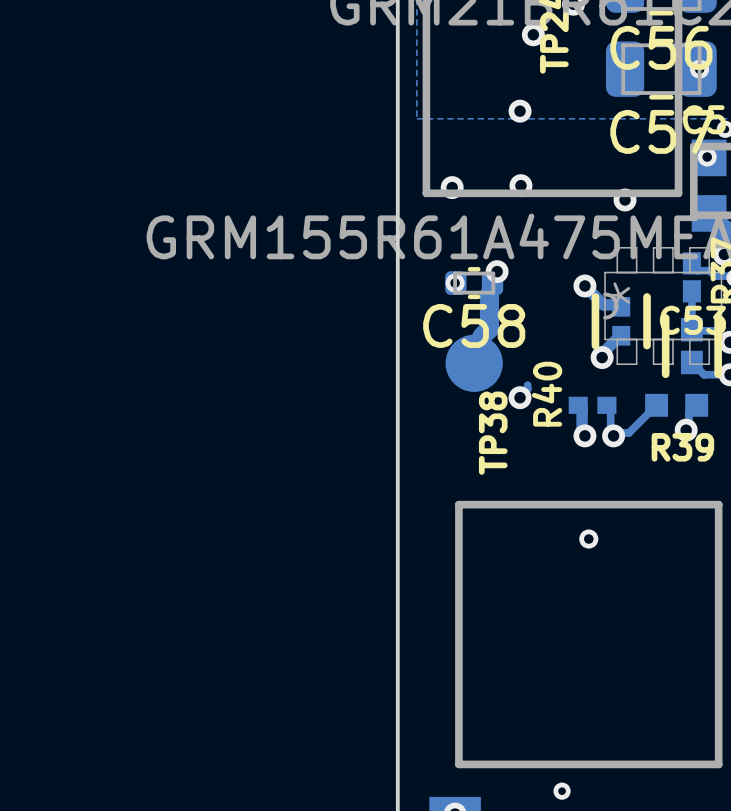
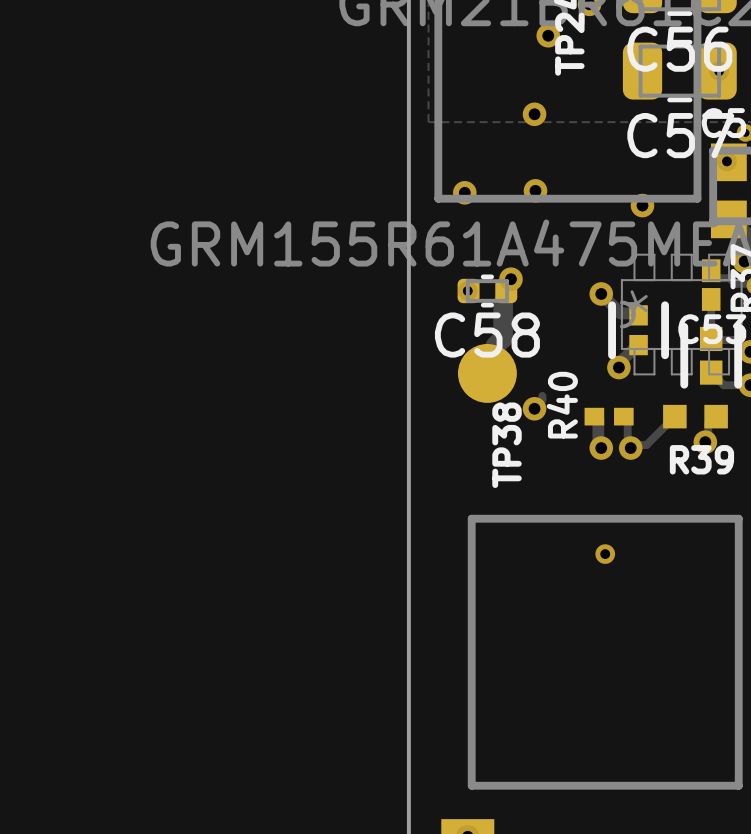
via: (562, 791) -> none

